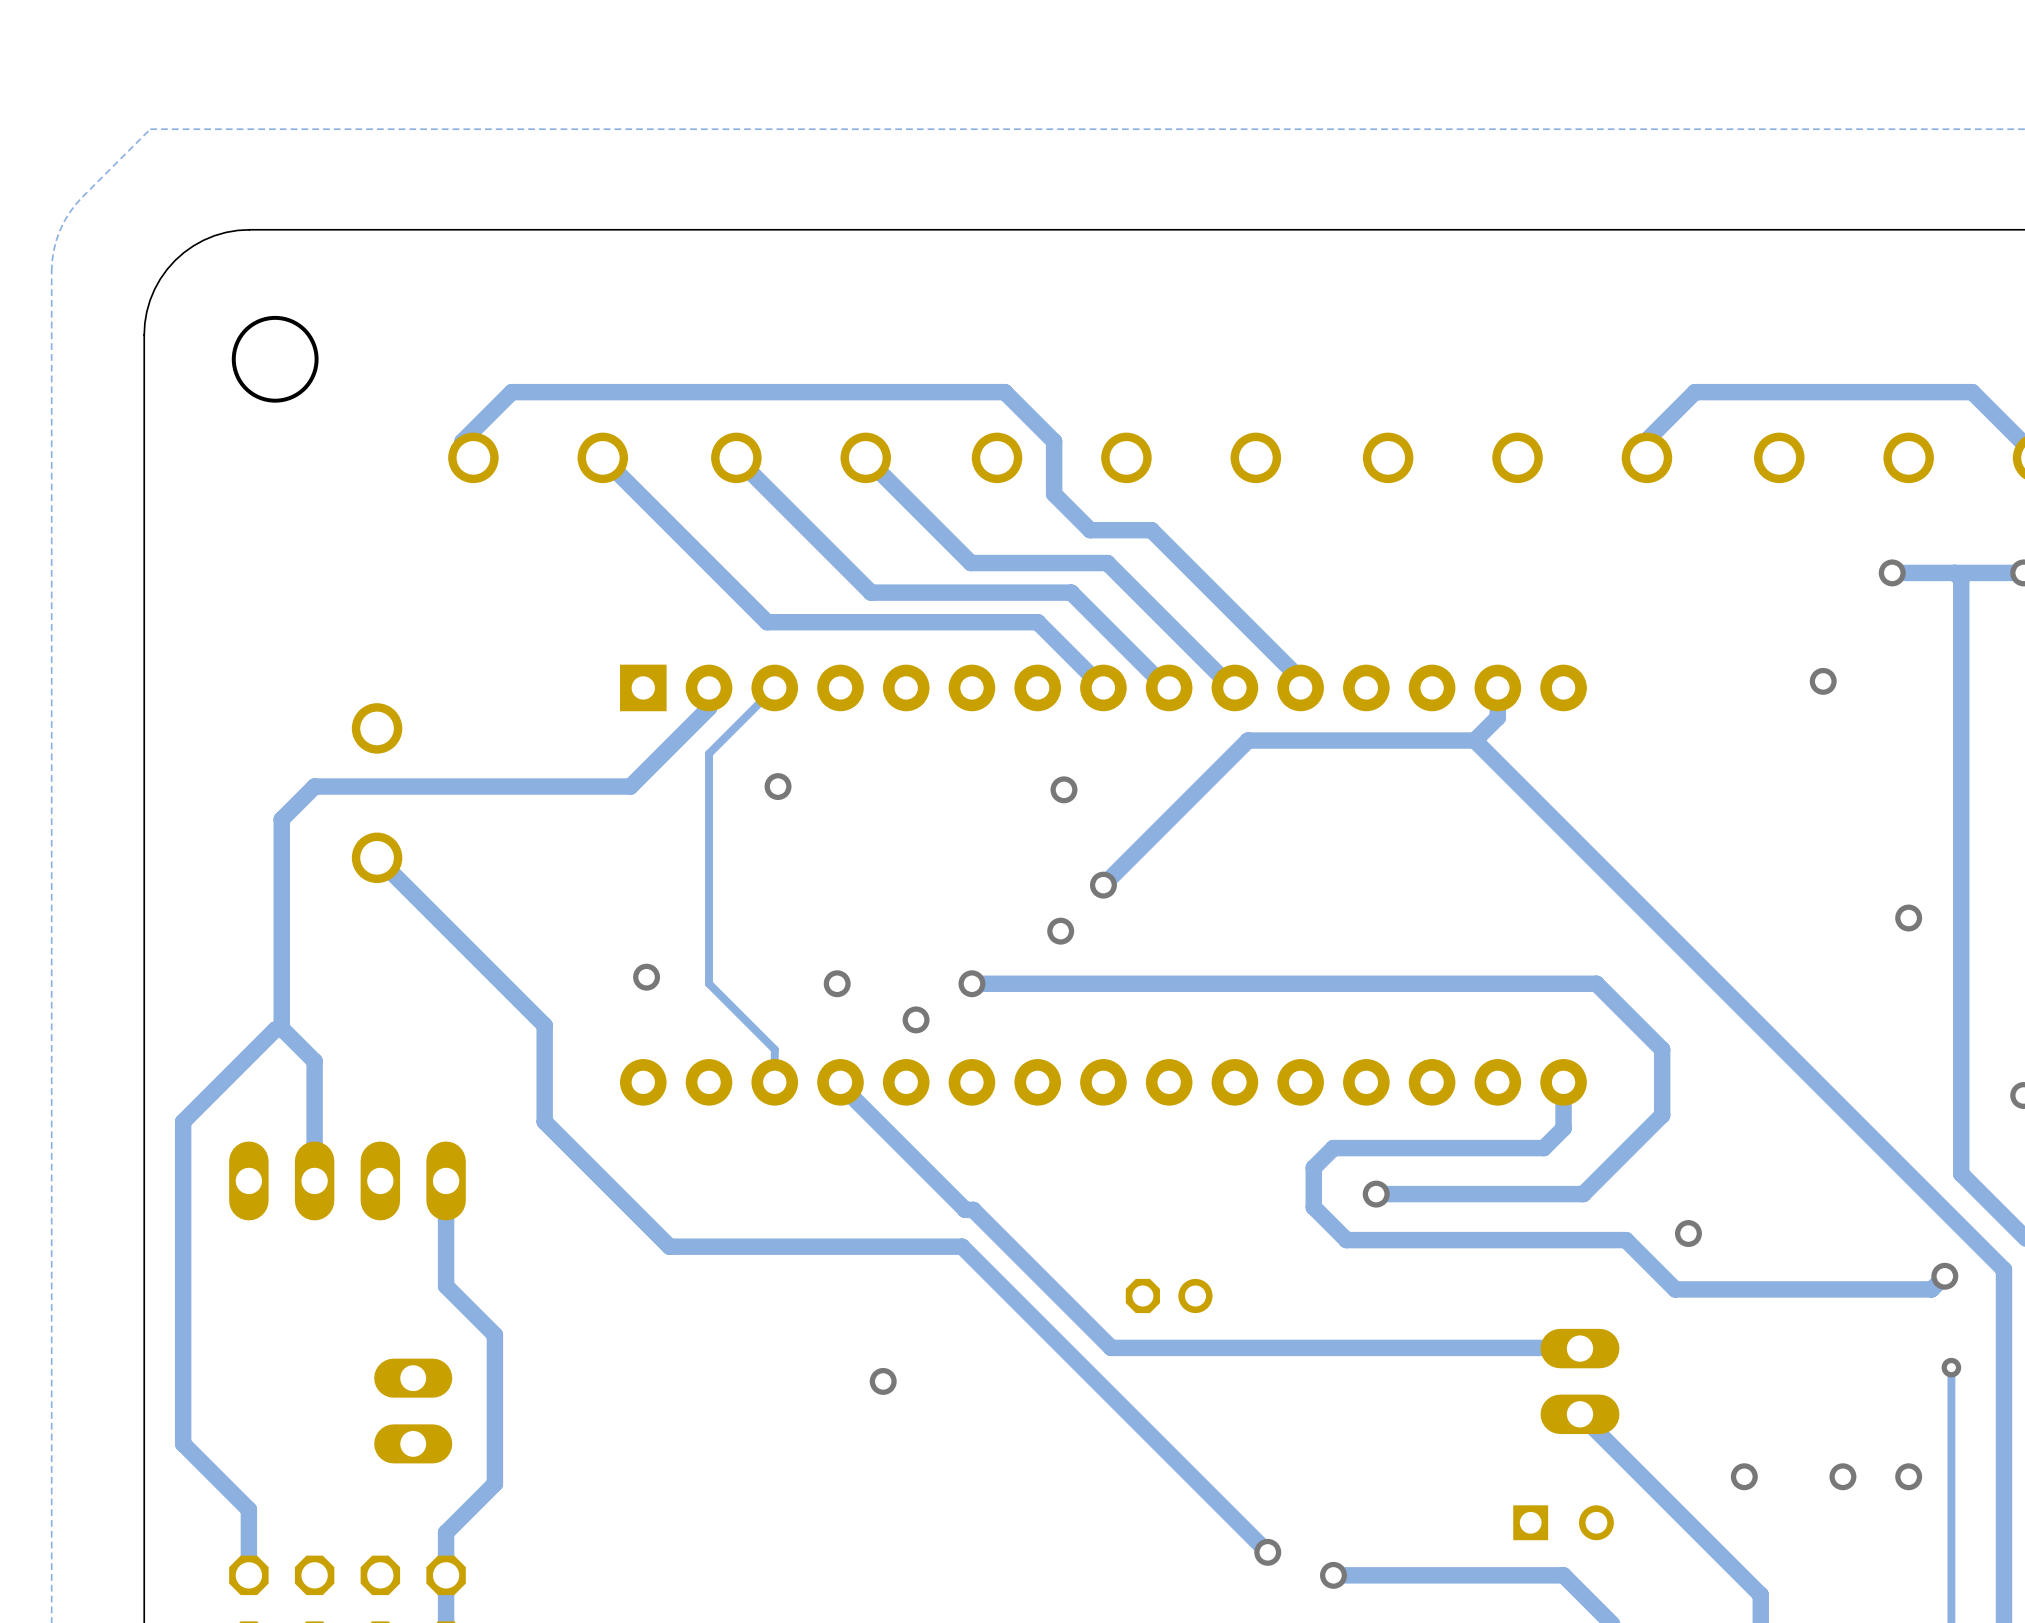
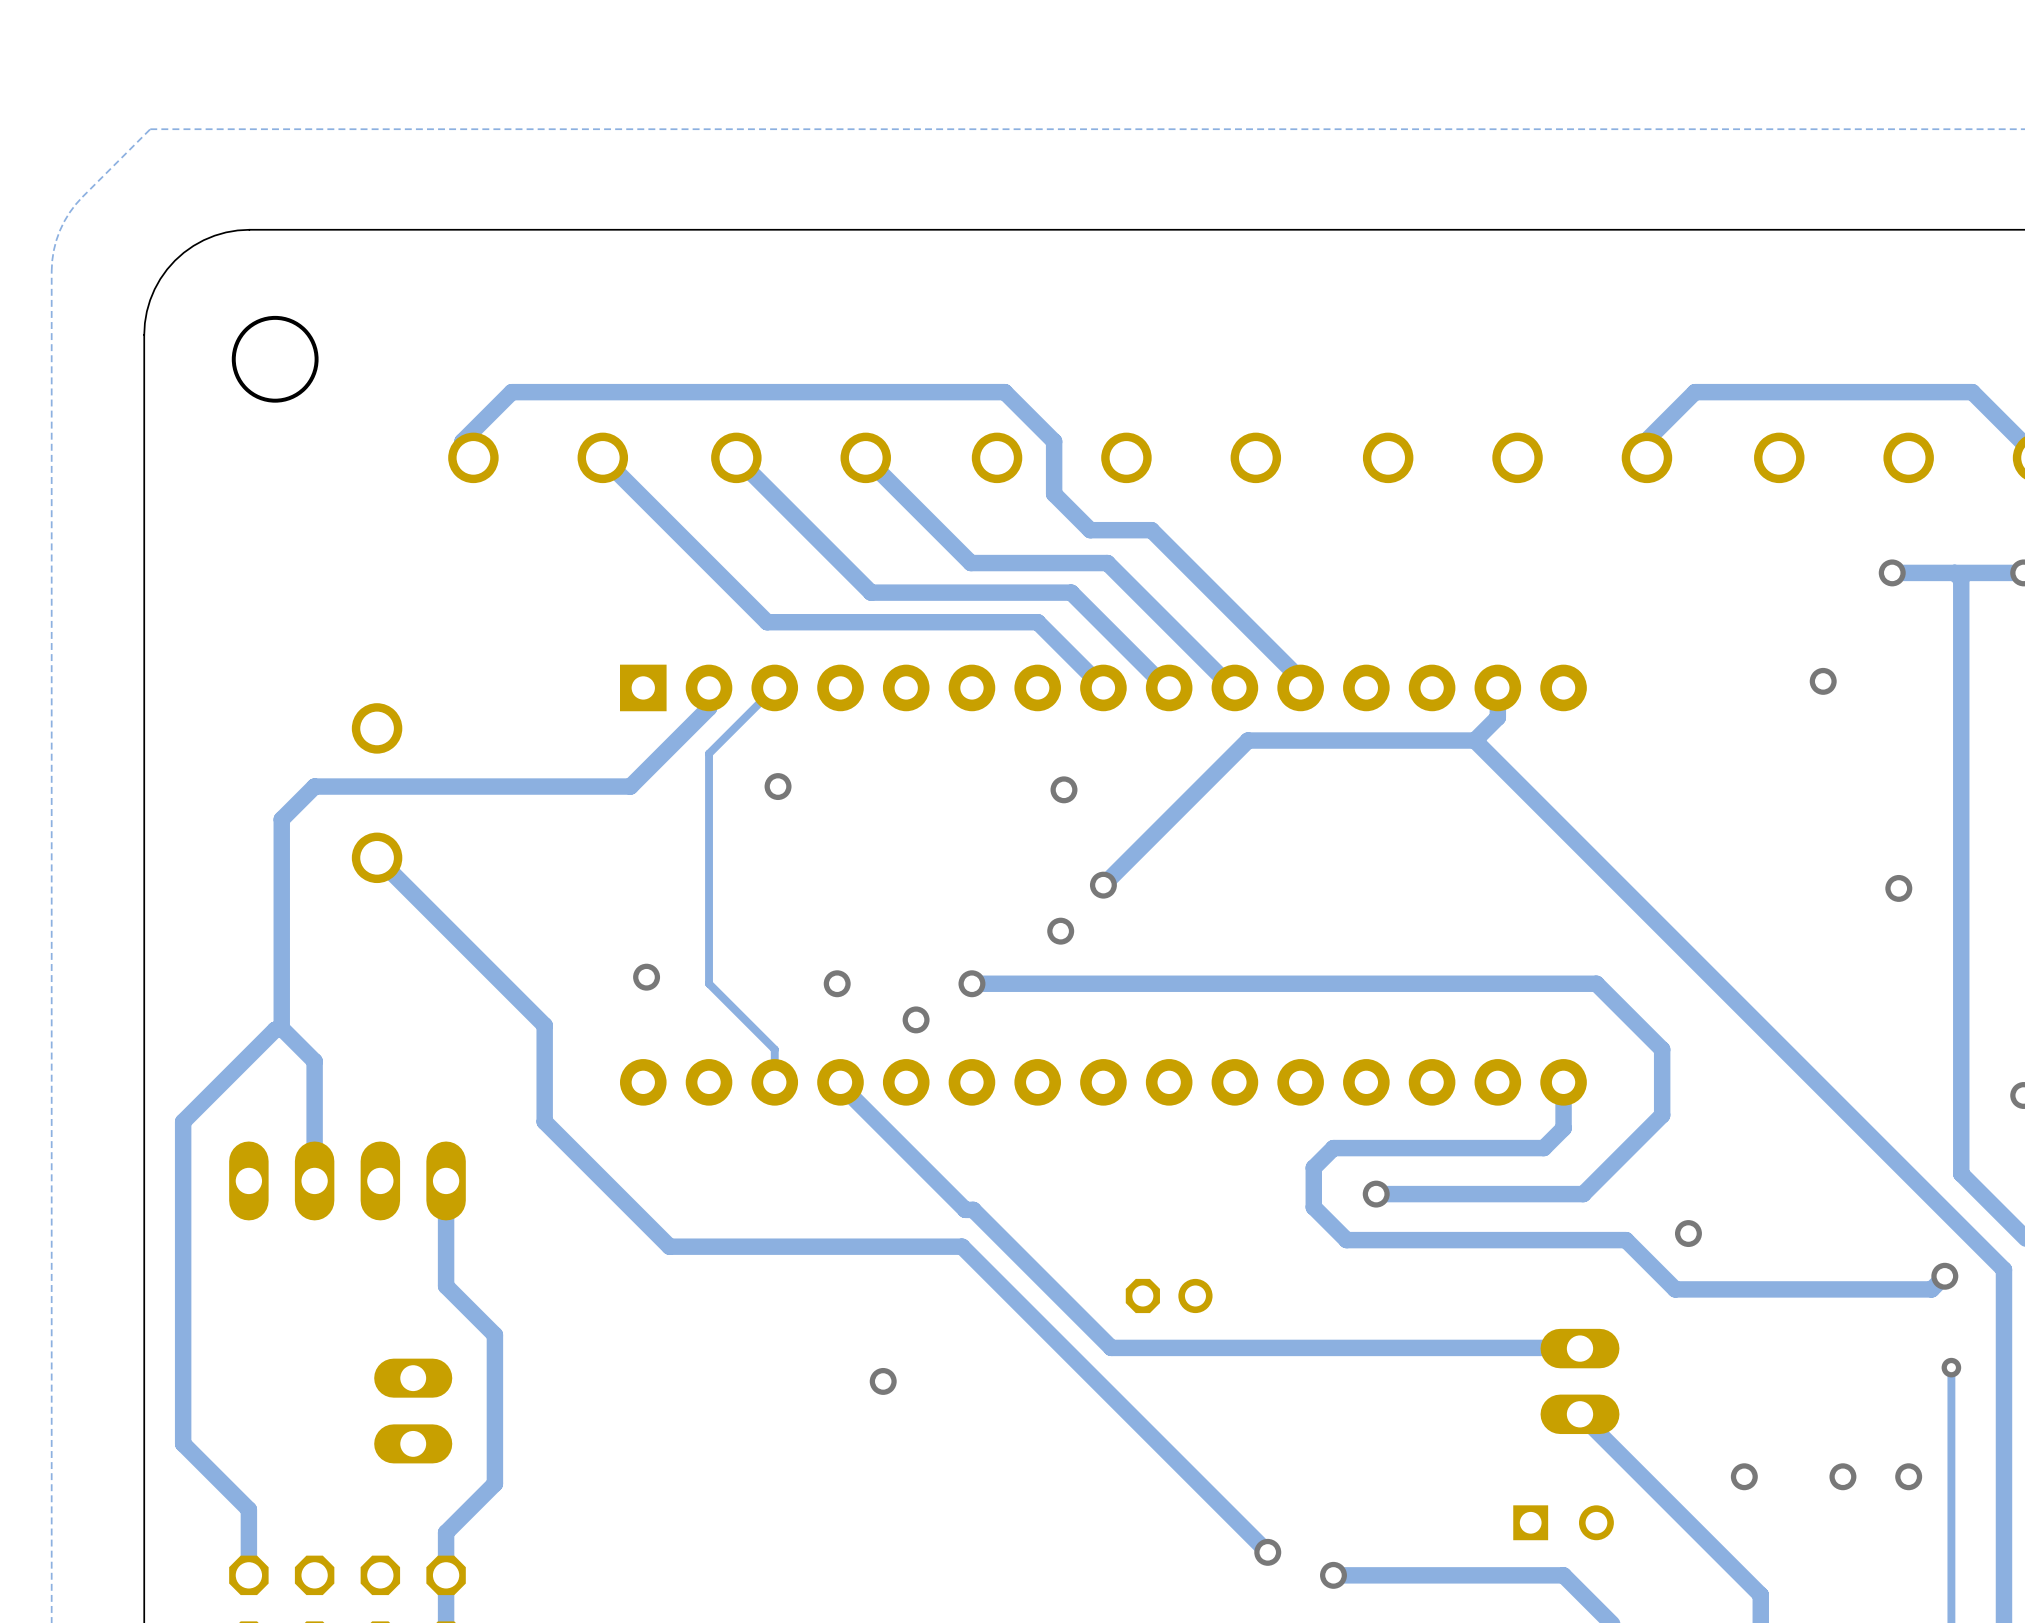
via position: (1908, 918) -> (1898, 888)

